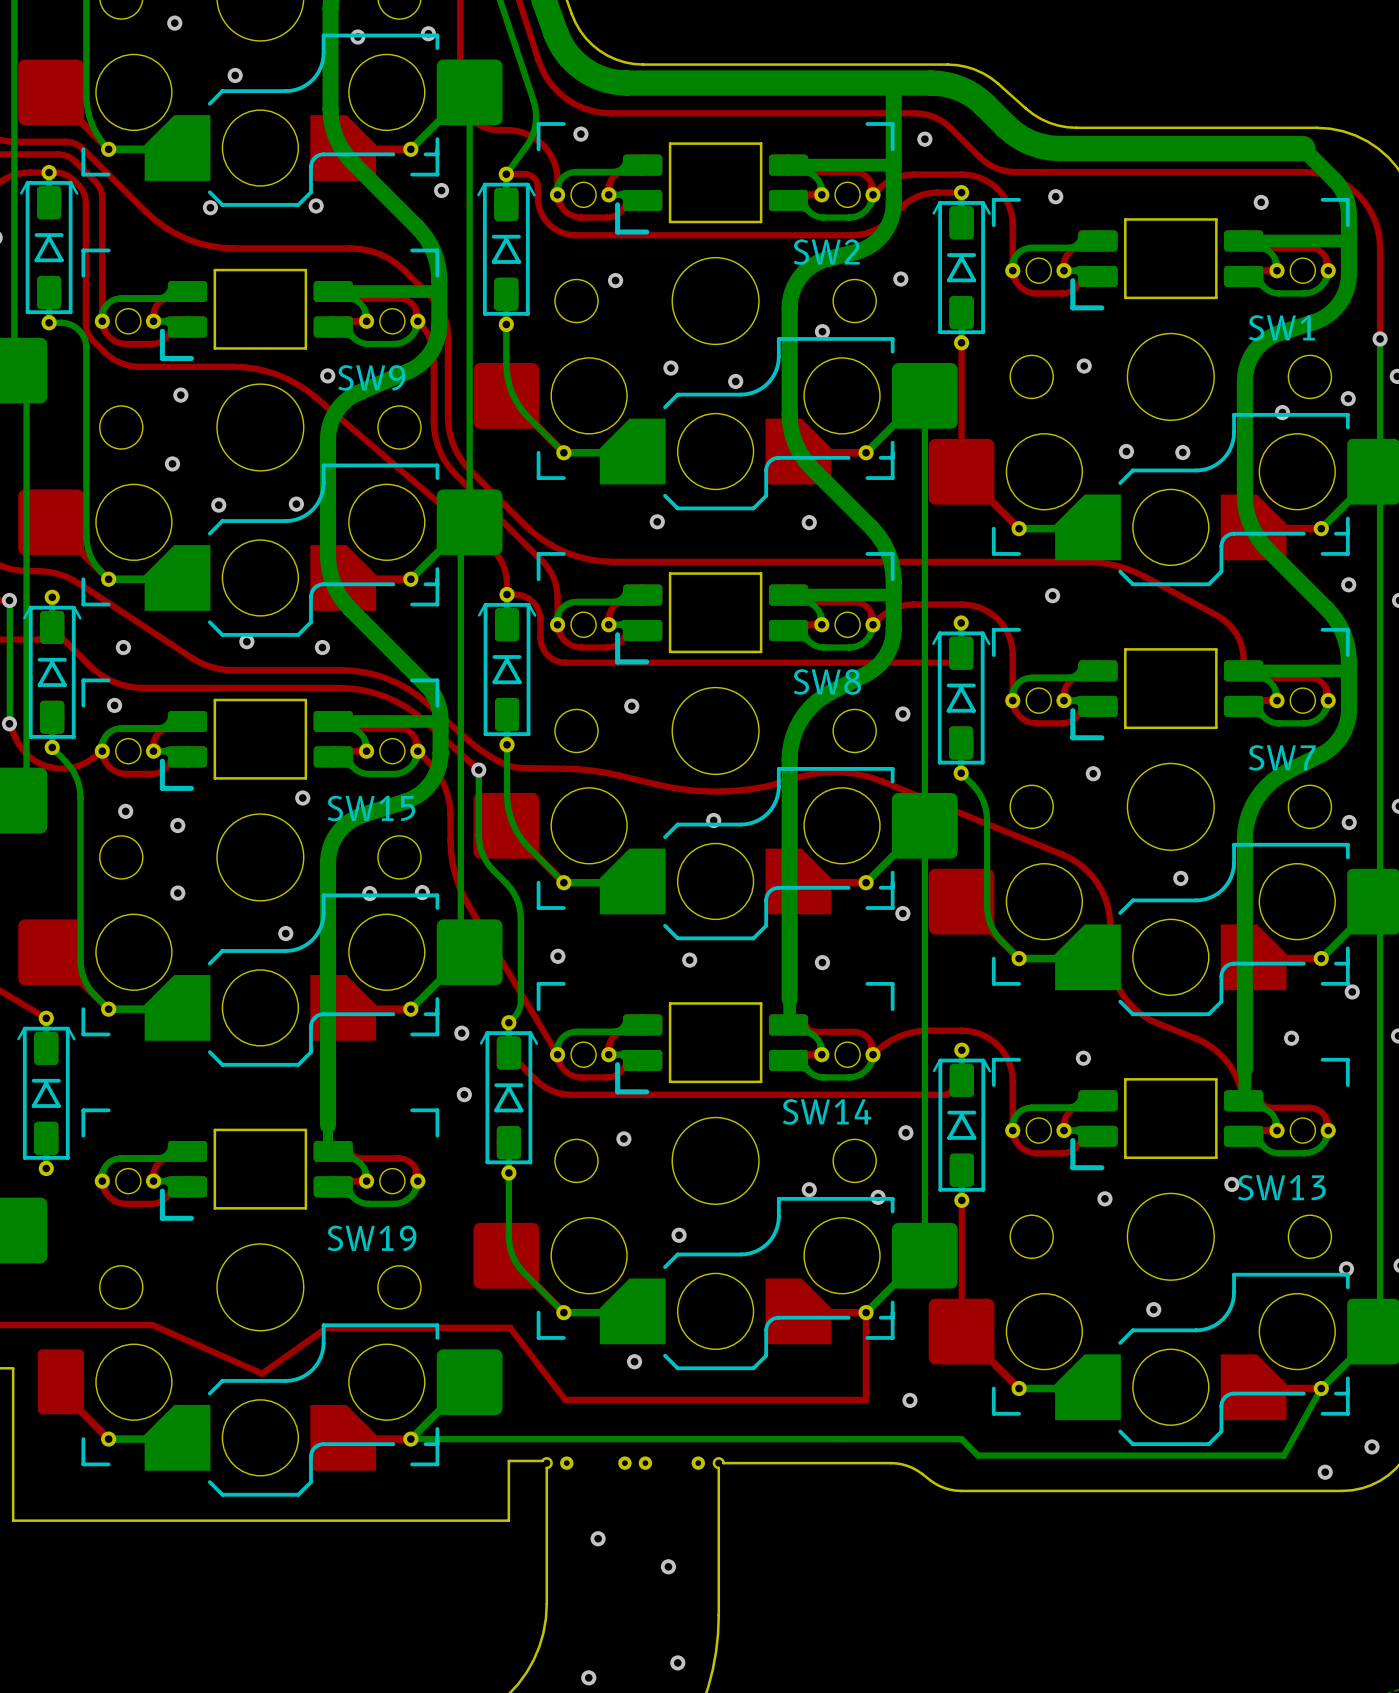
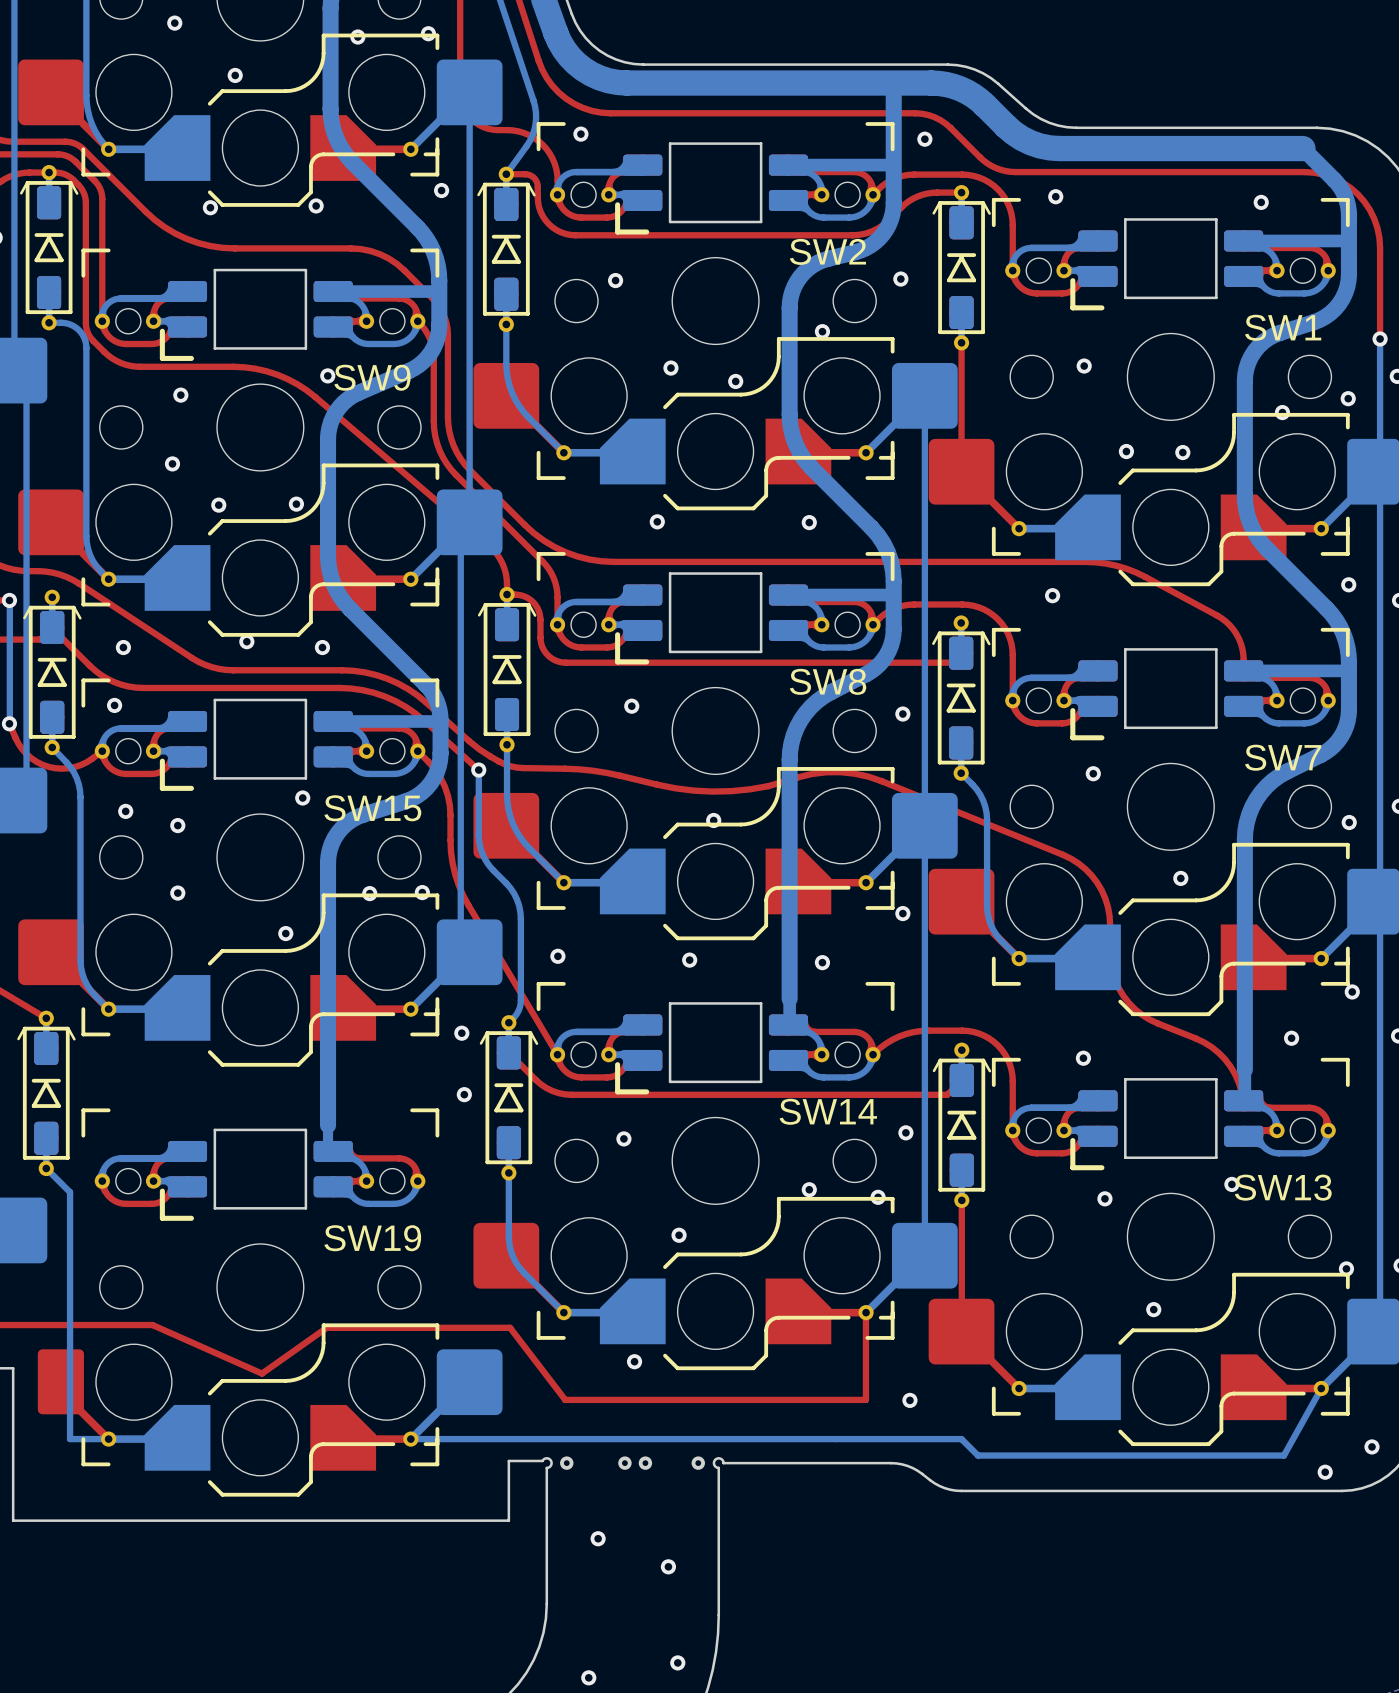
bottom track: none -> (46, 1168) (70, 1192) (70, 1439) (108, 1439)

